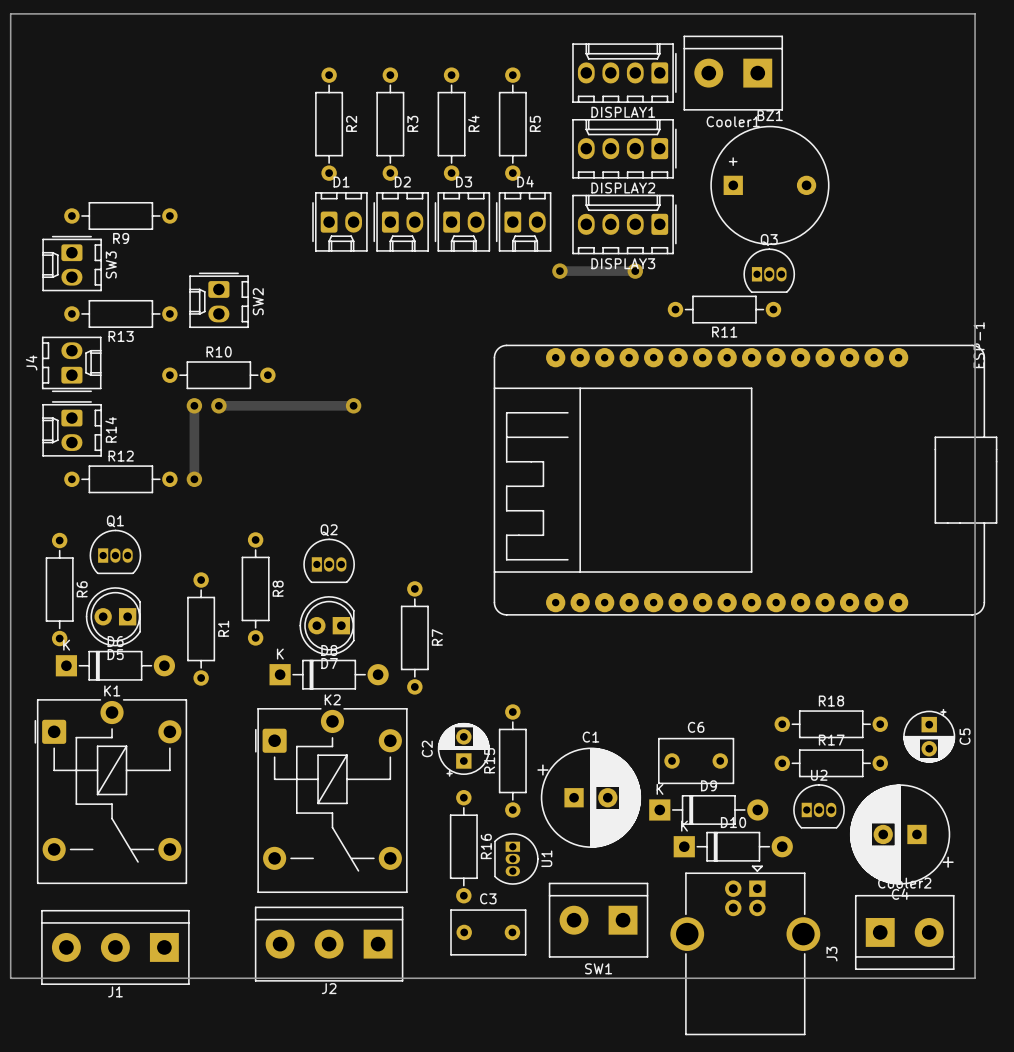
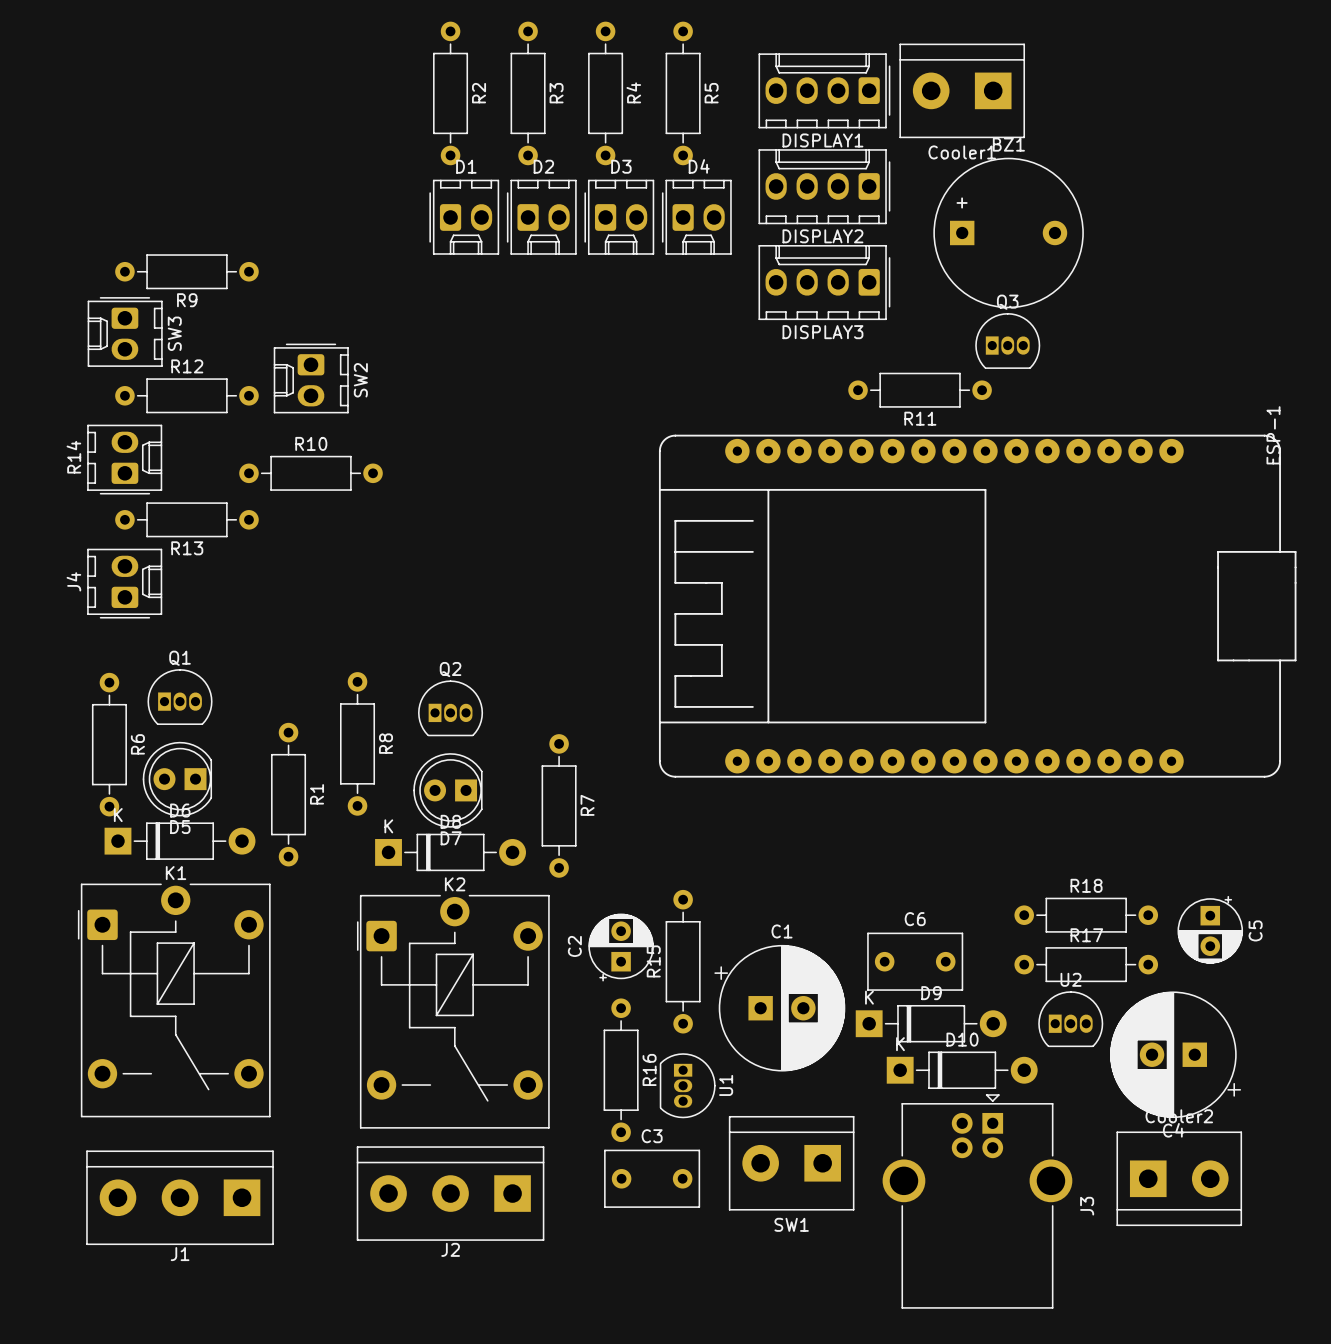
board edge: (10, 13) (975, 13) (975, 978) (10, 978) (10, 13) -> none
R2 position: (329, 124) -> (450, 93)
R3 position: (390, 124) -> (528, 93)
R4 position: (451, 124) -> (605, 93)
R5 position: (512, 124) -> (683, 93)
D1 position: (339, 221) -> (464, 217)
D2 position: (401, 221) -> (541, 217)
D3 position: (462, 221) -> (619, 217)
D4 position: (523, 221) -> (696, 217)
track: (559, 271) (635, 271) -> none
via: (559, 271) -> none
via: (635, 271) -> none
R11 position: (724, 309) -> (920, 390)
R13 name: R13 (121, 336) -> R12 (187, 366)
J4 name: J4 (31, 362) -> R14 (73, 457)
track: (194, 405) (194, 479) -> none
via: (194, 405) -> none
track: (218, 405) (353, 405) -> none
via: (218, 405) -> none
via: (353, 405) -> none
R13: none -> (186, 519)
R14: (72, 428) -> none
J4: none -> (124, 583)
R12: (120, 479) -> none
via: (194, 479) -> none

